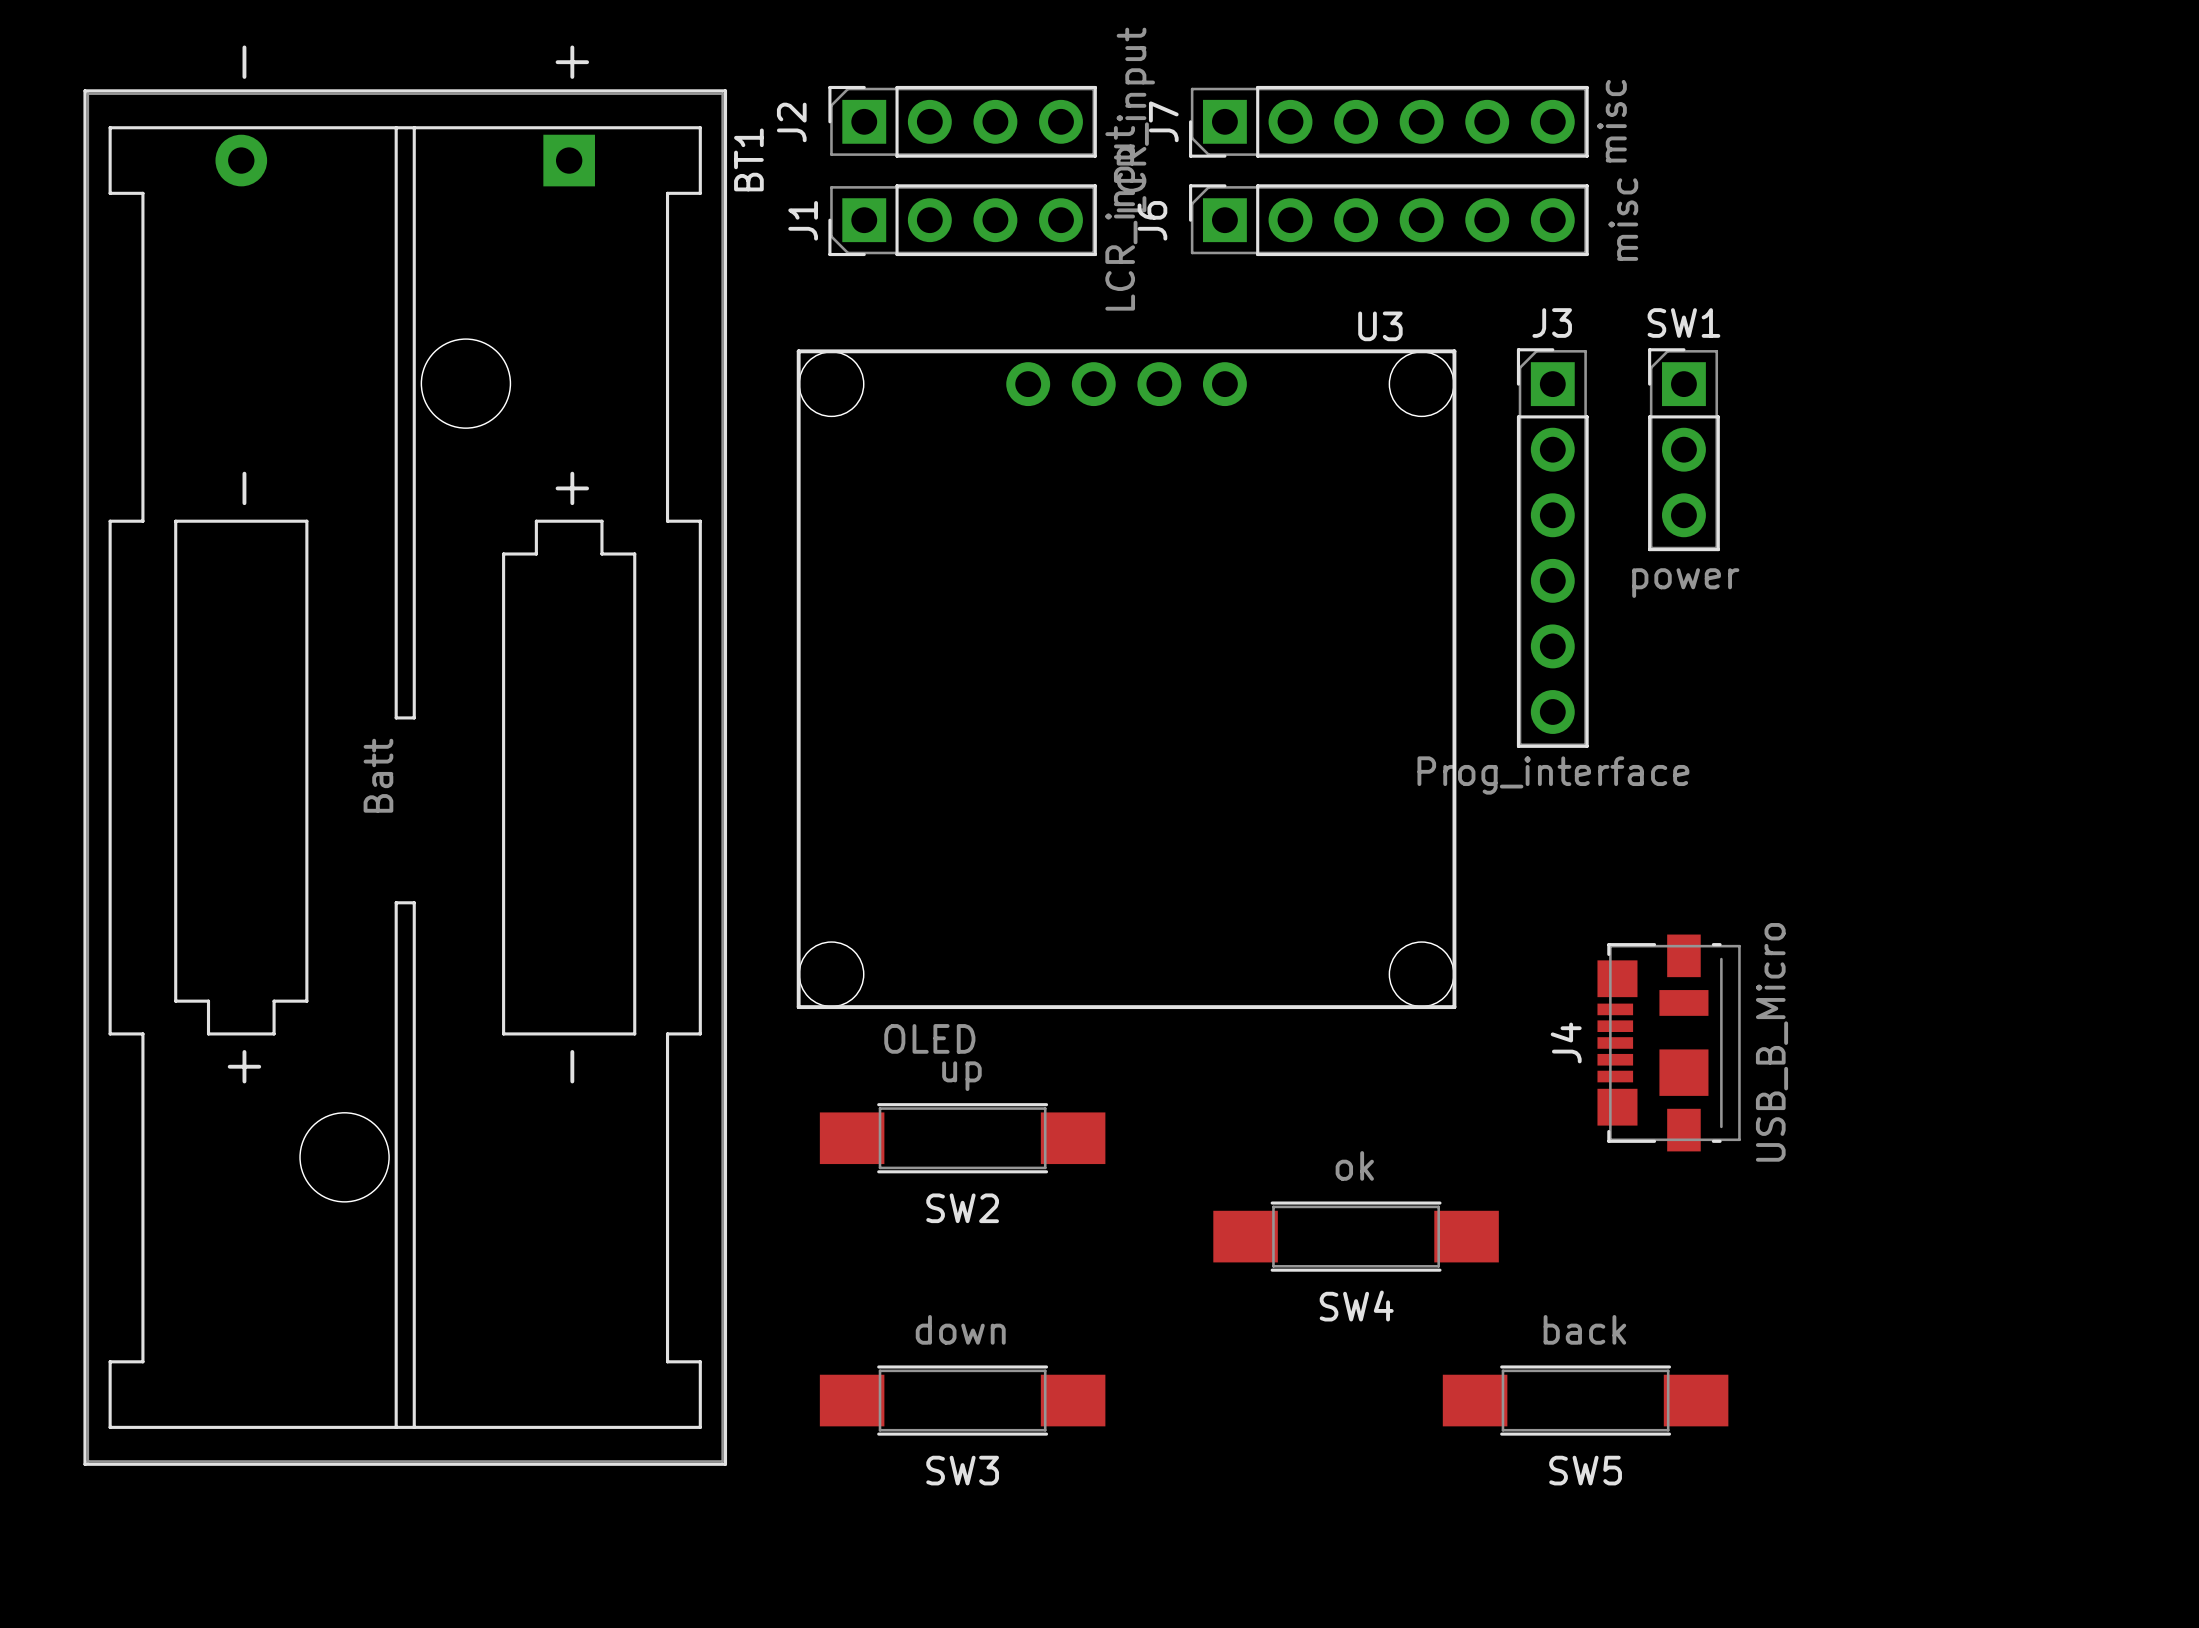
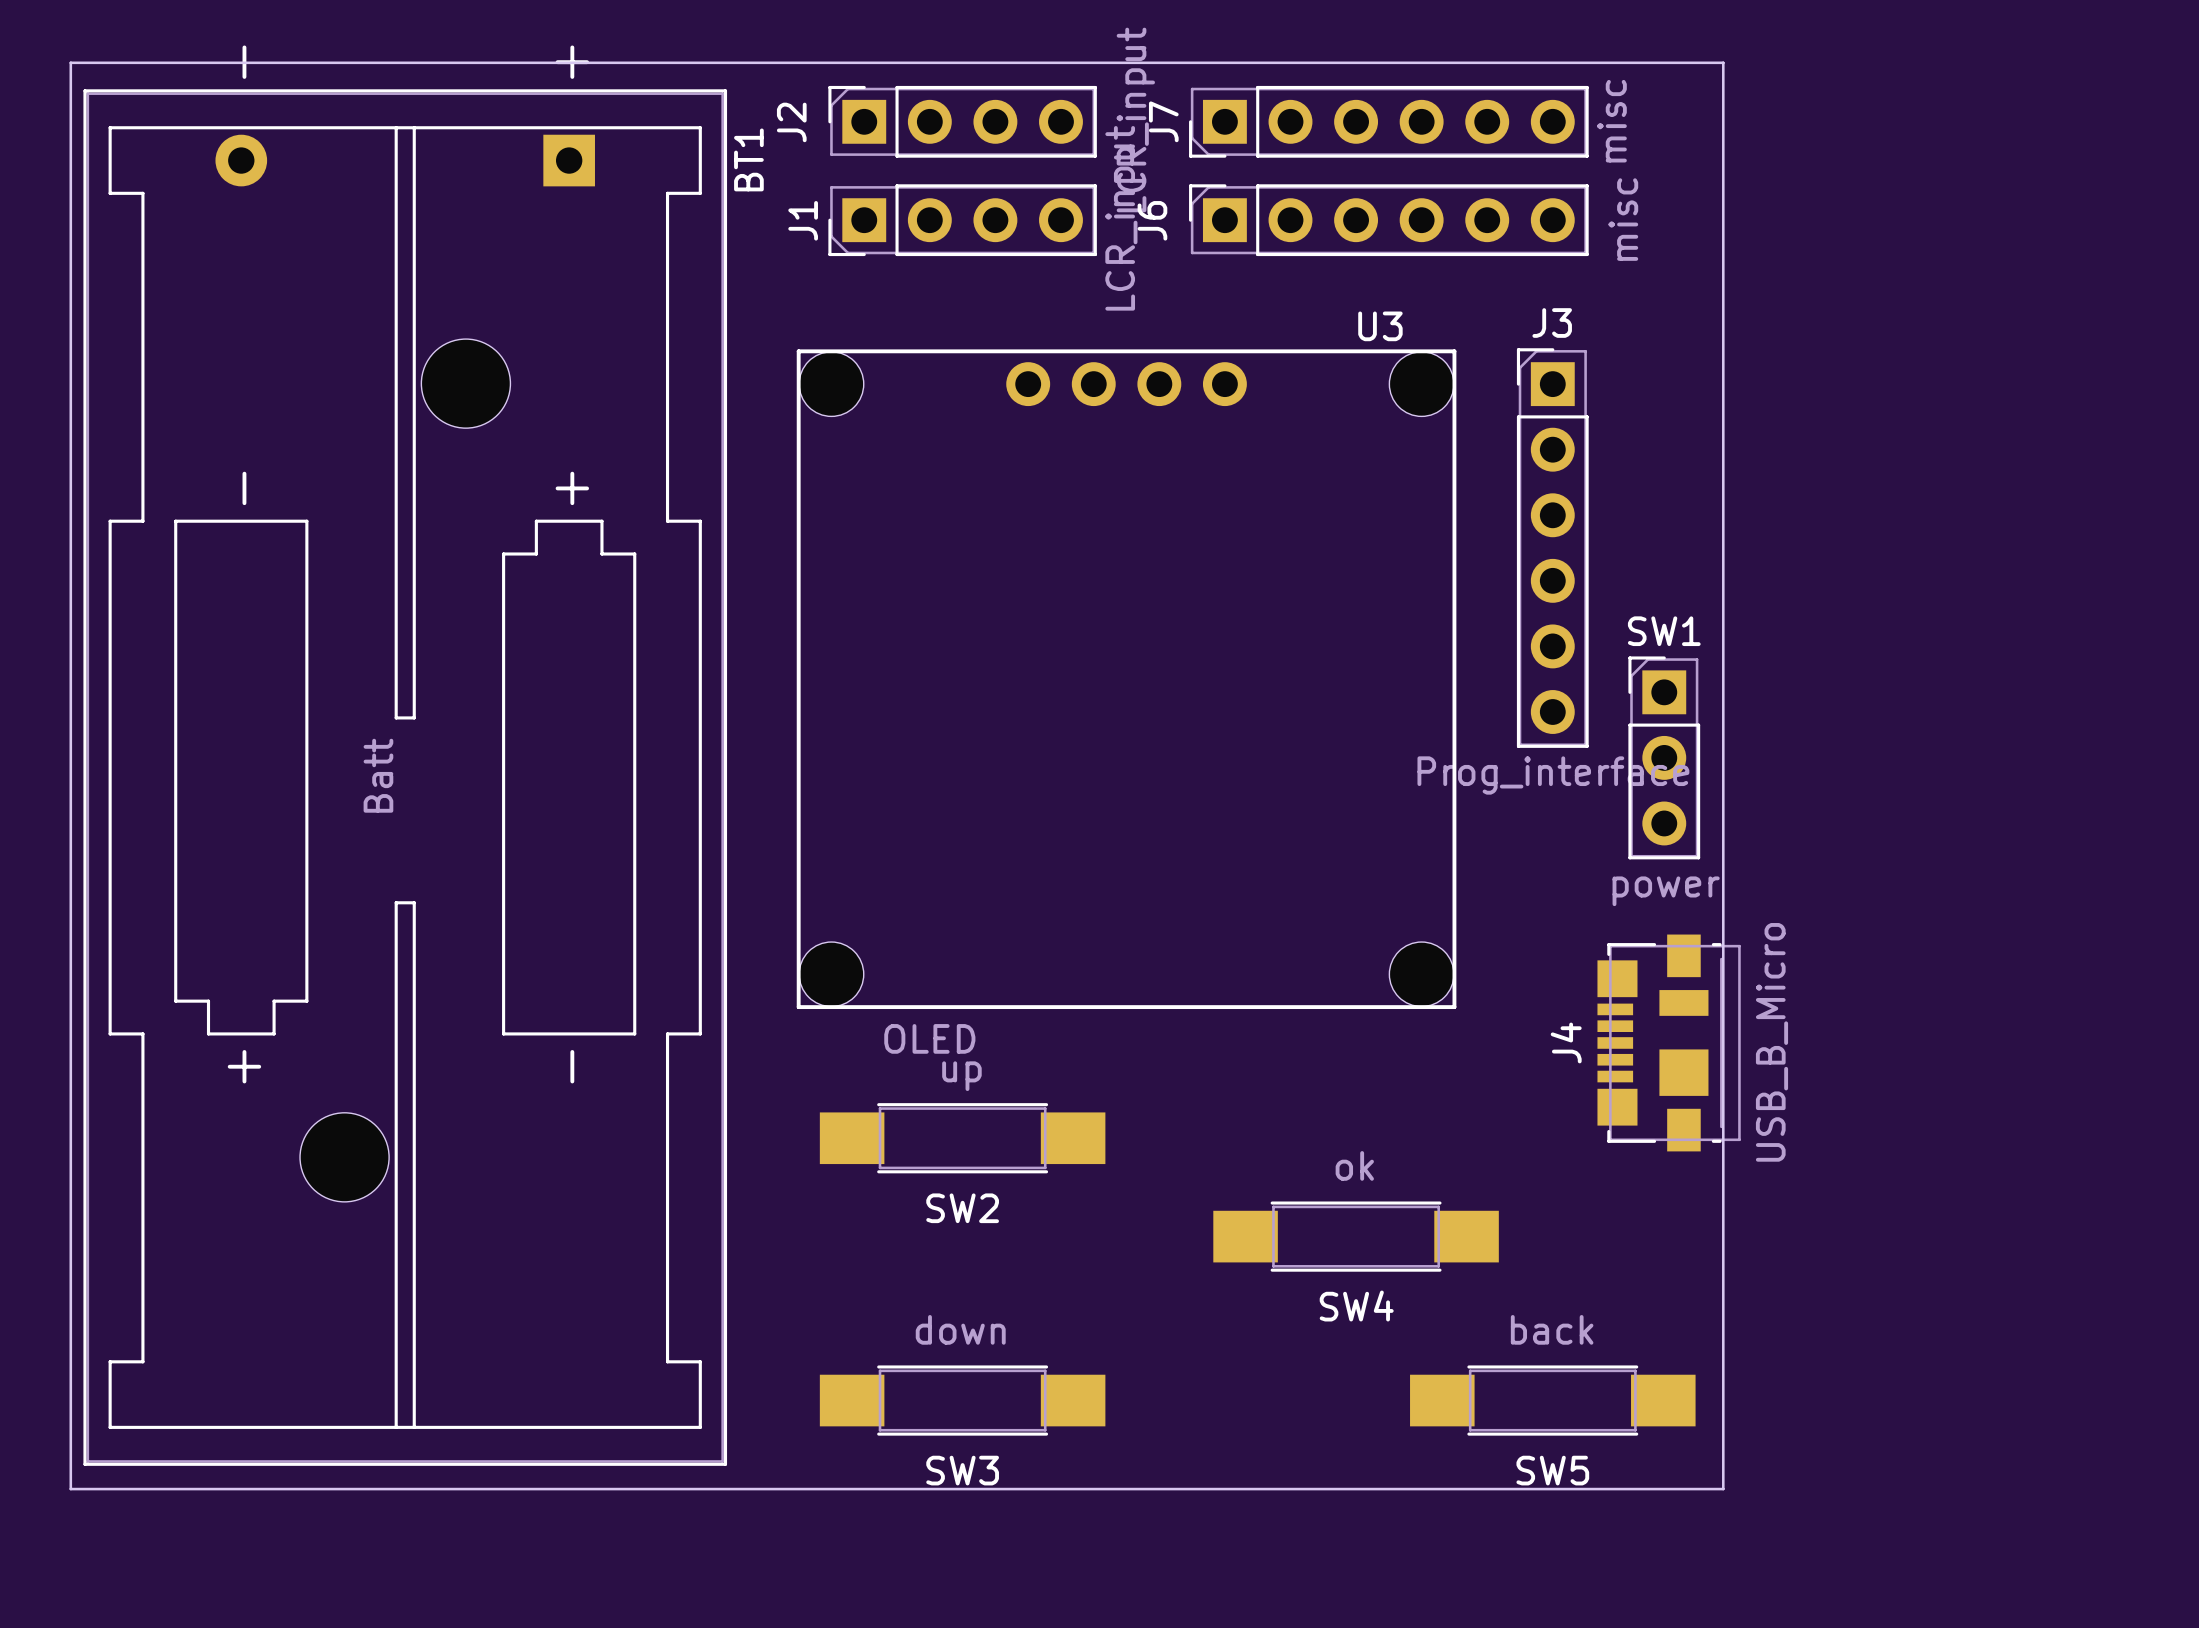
board edge: none -> (70, 62) (1723, 62) (1723, 1489) (70, 1489) (70, 62)
SW1 position: (1683, 449) -> (1664, 757)
SW5 position: (1585, 1400) -> (1552, 1400)

